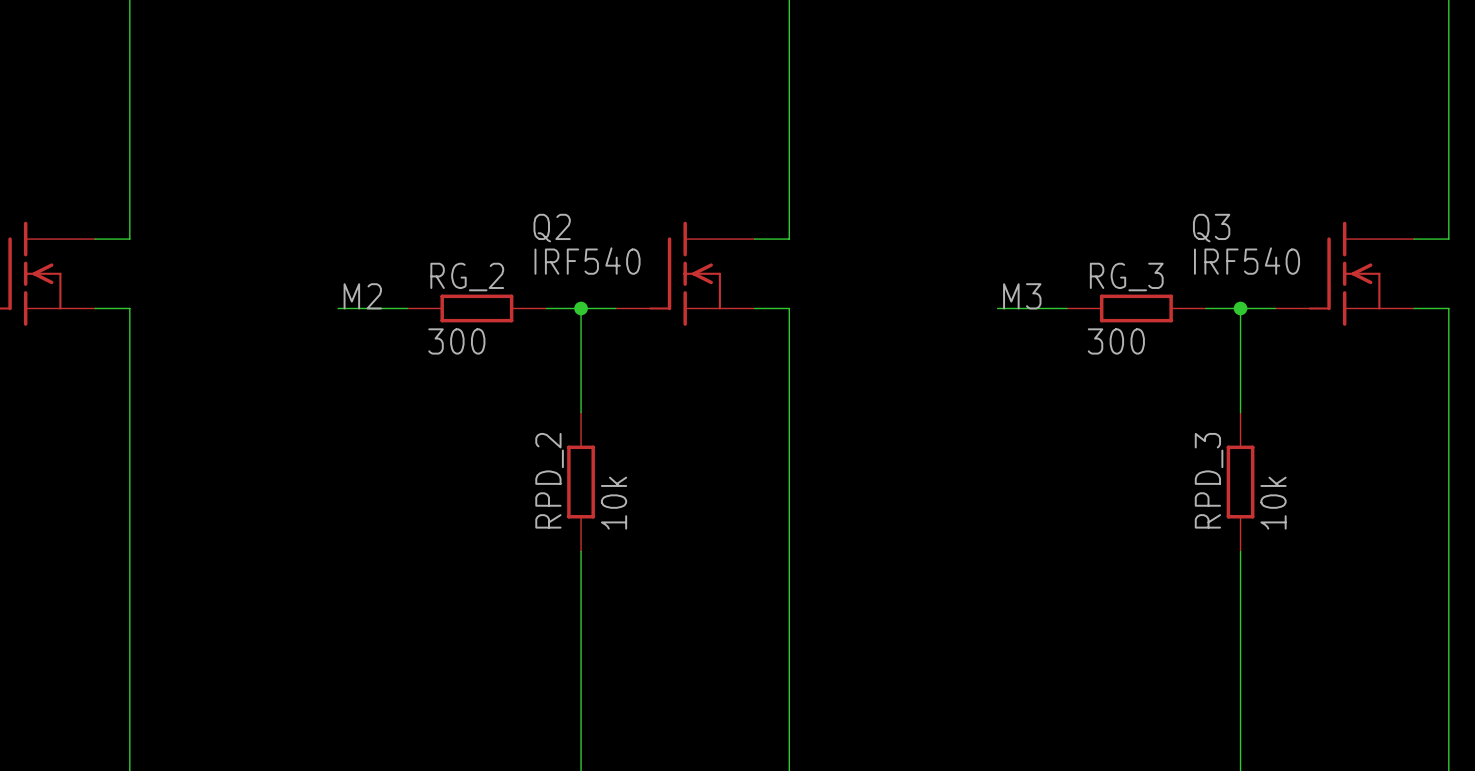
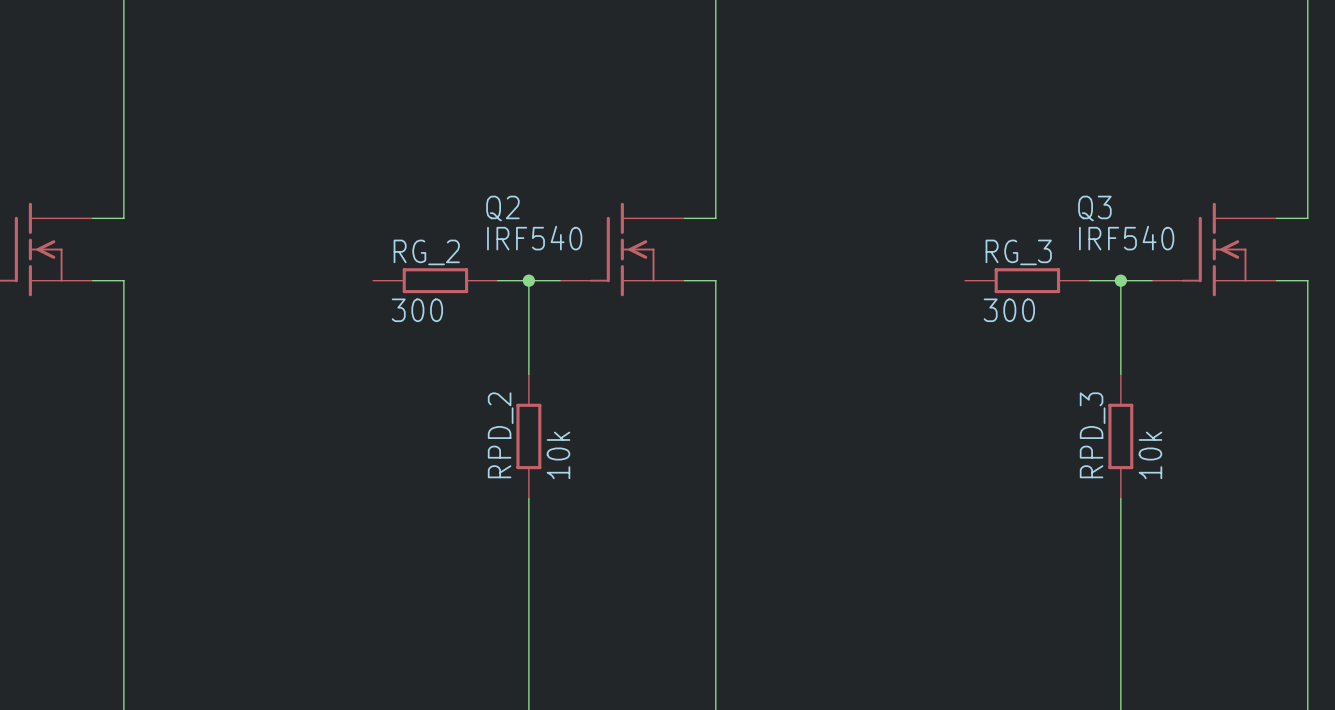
label: M2 (362, 296) -> none
label: M3 (1022, 296) -> none
wire: (338, 308) (407, 308) -> none
wire: (997, 308) (1066, 308) -> none

